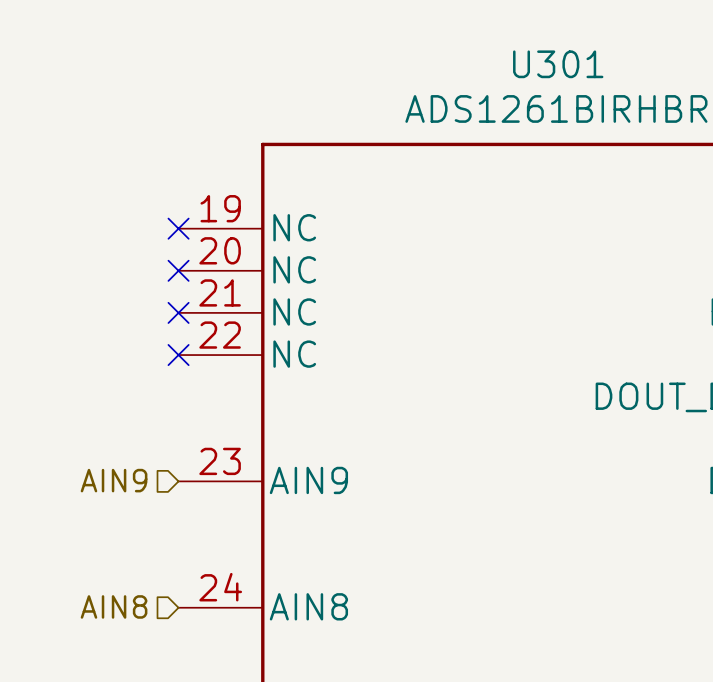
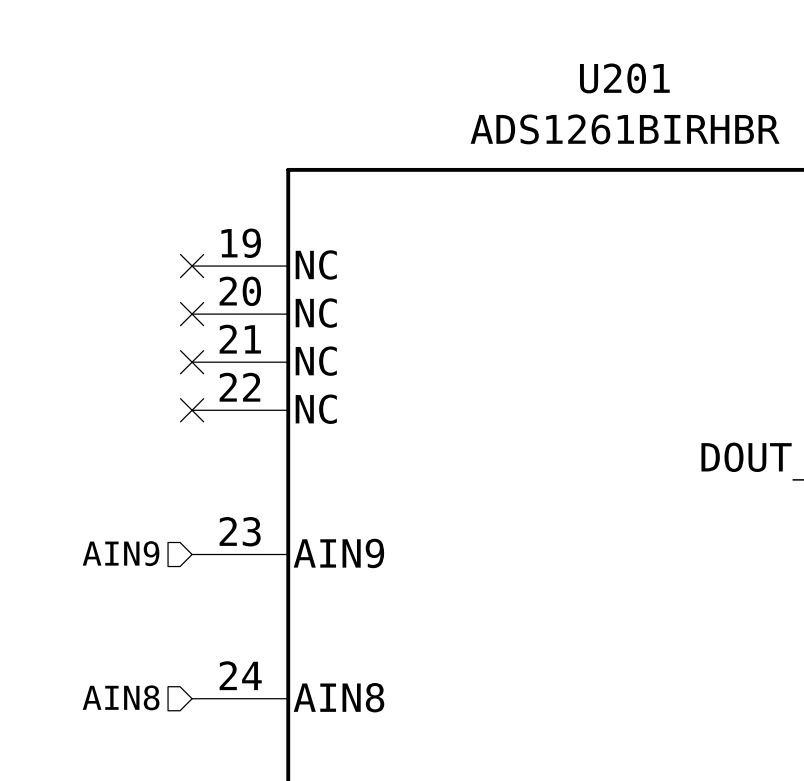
U301 name: U301 (558, 64) -> U201 (624, 78)

